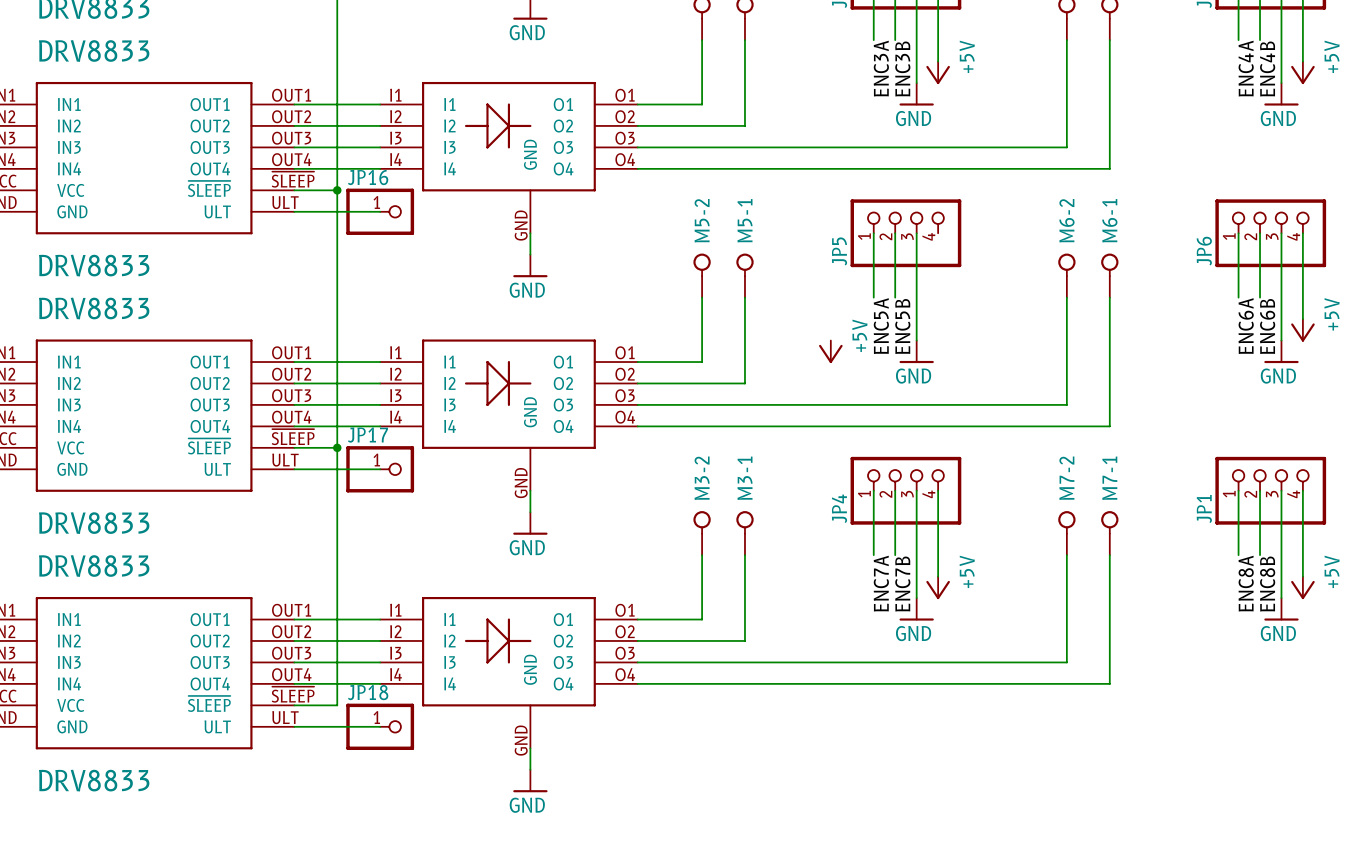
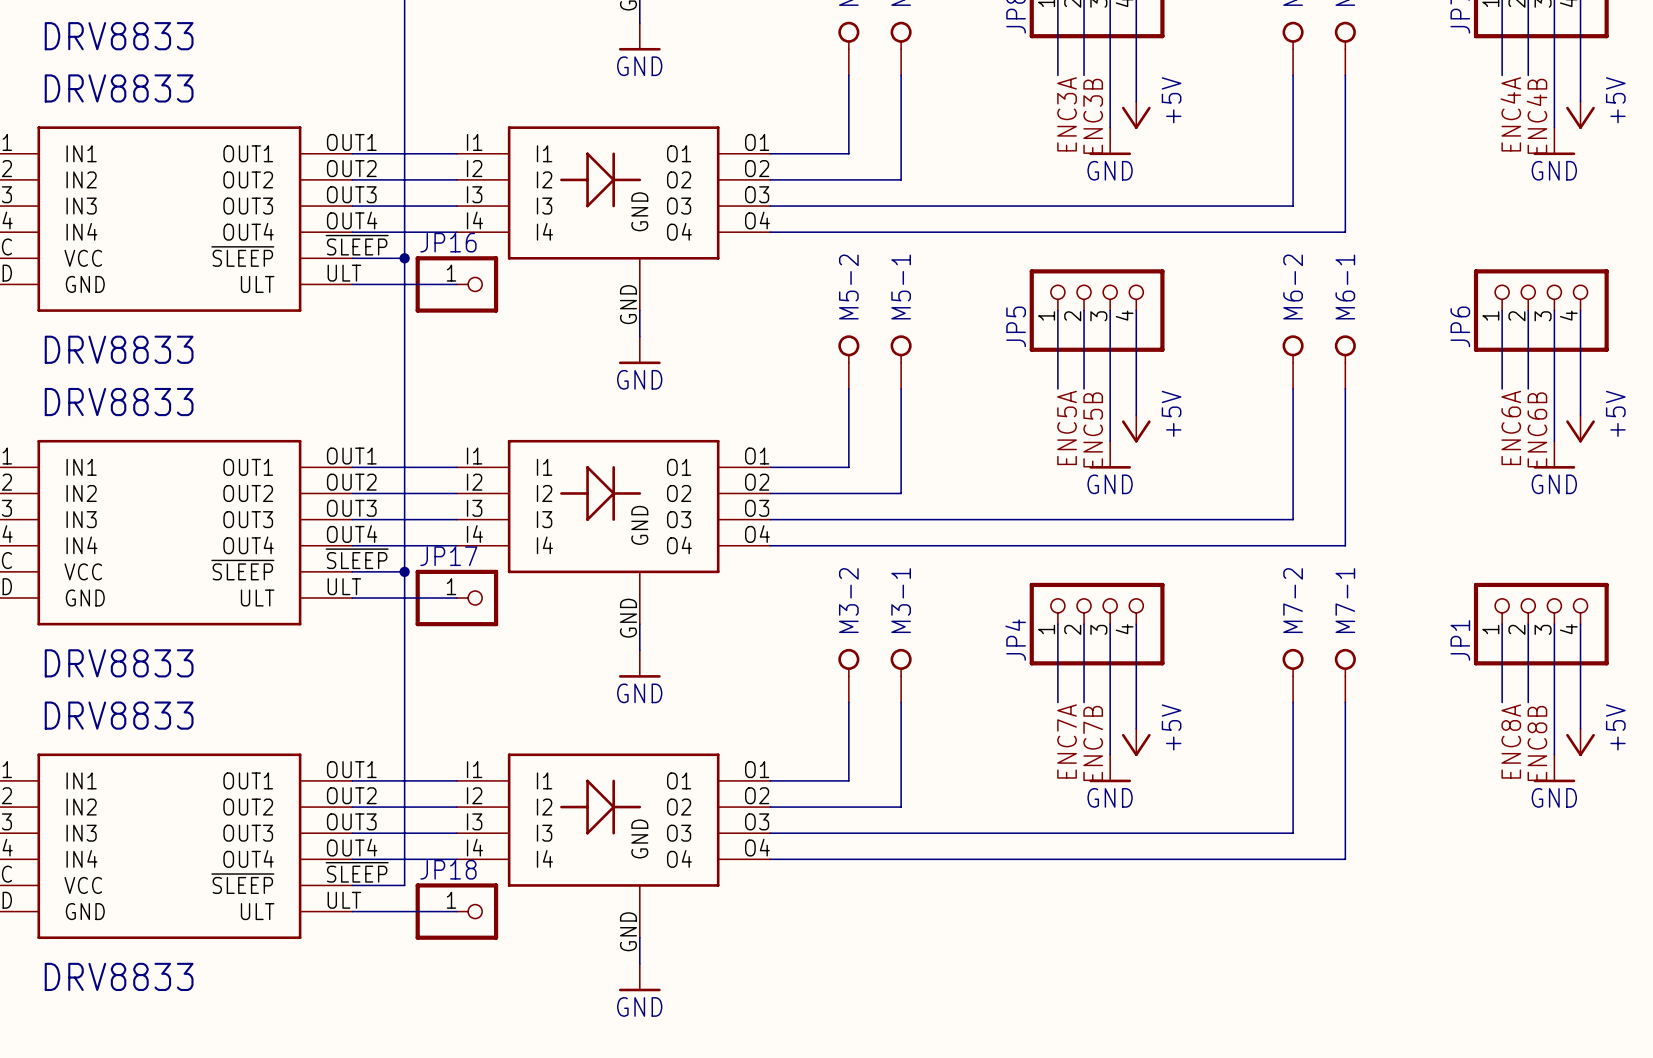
wire: none -> (1136, 310) (1136, 415)
power symbol position: +5V (830, 351) -> +5V (1136, 428)

